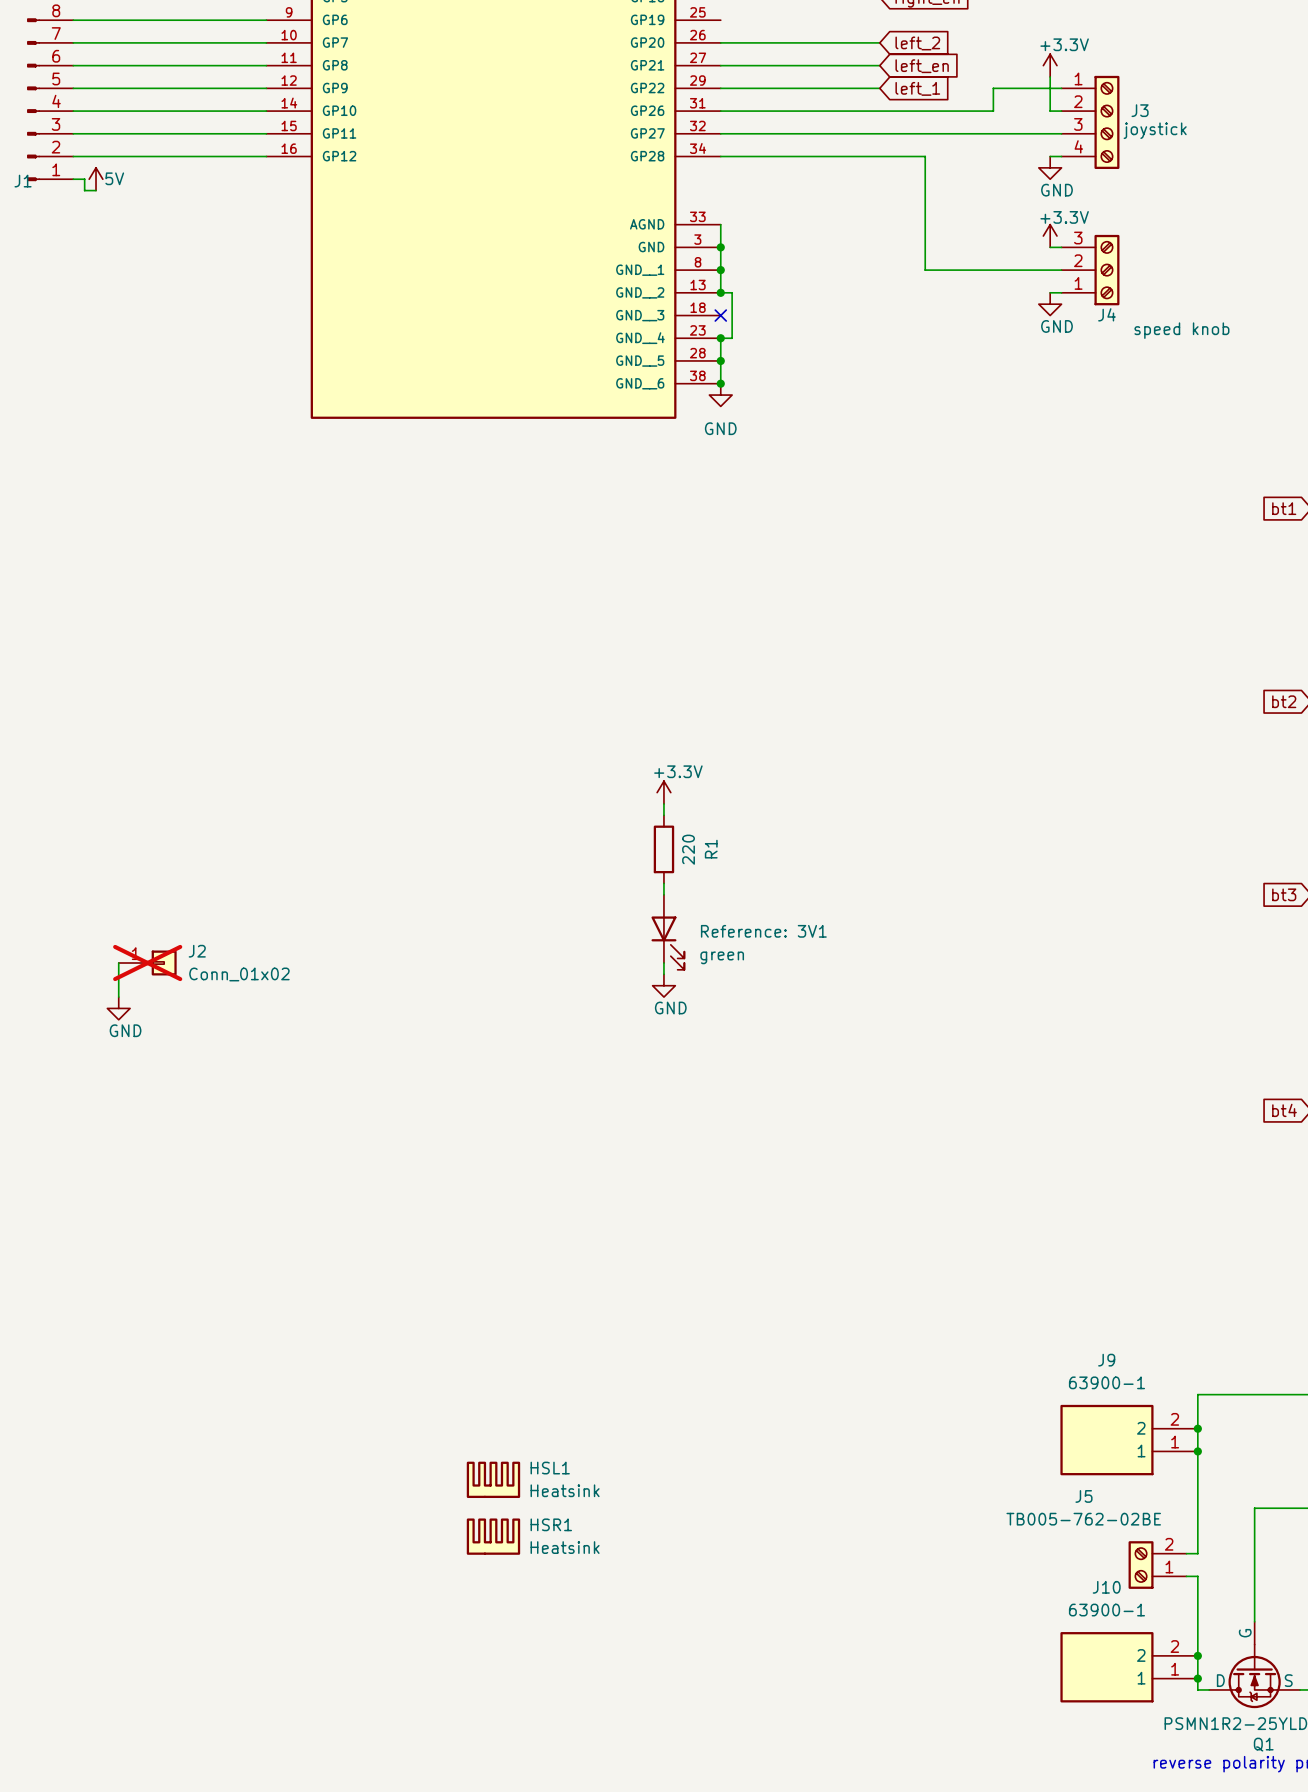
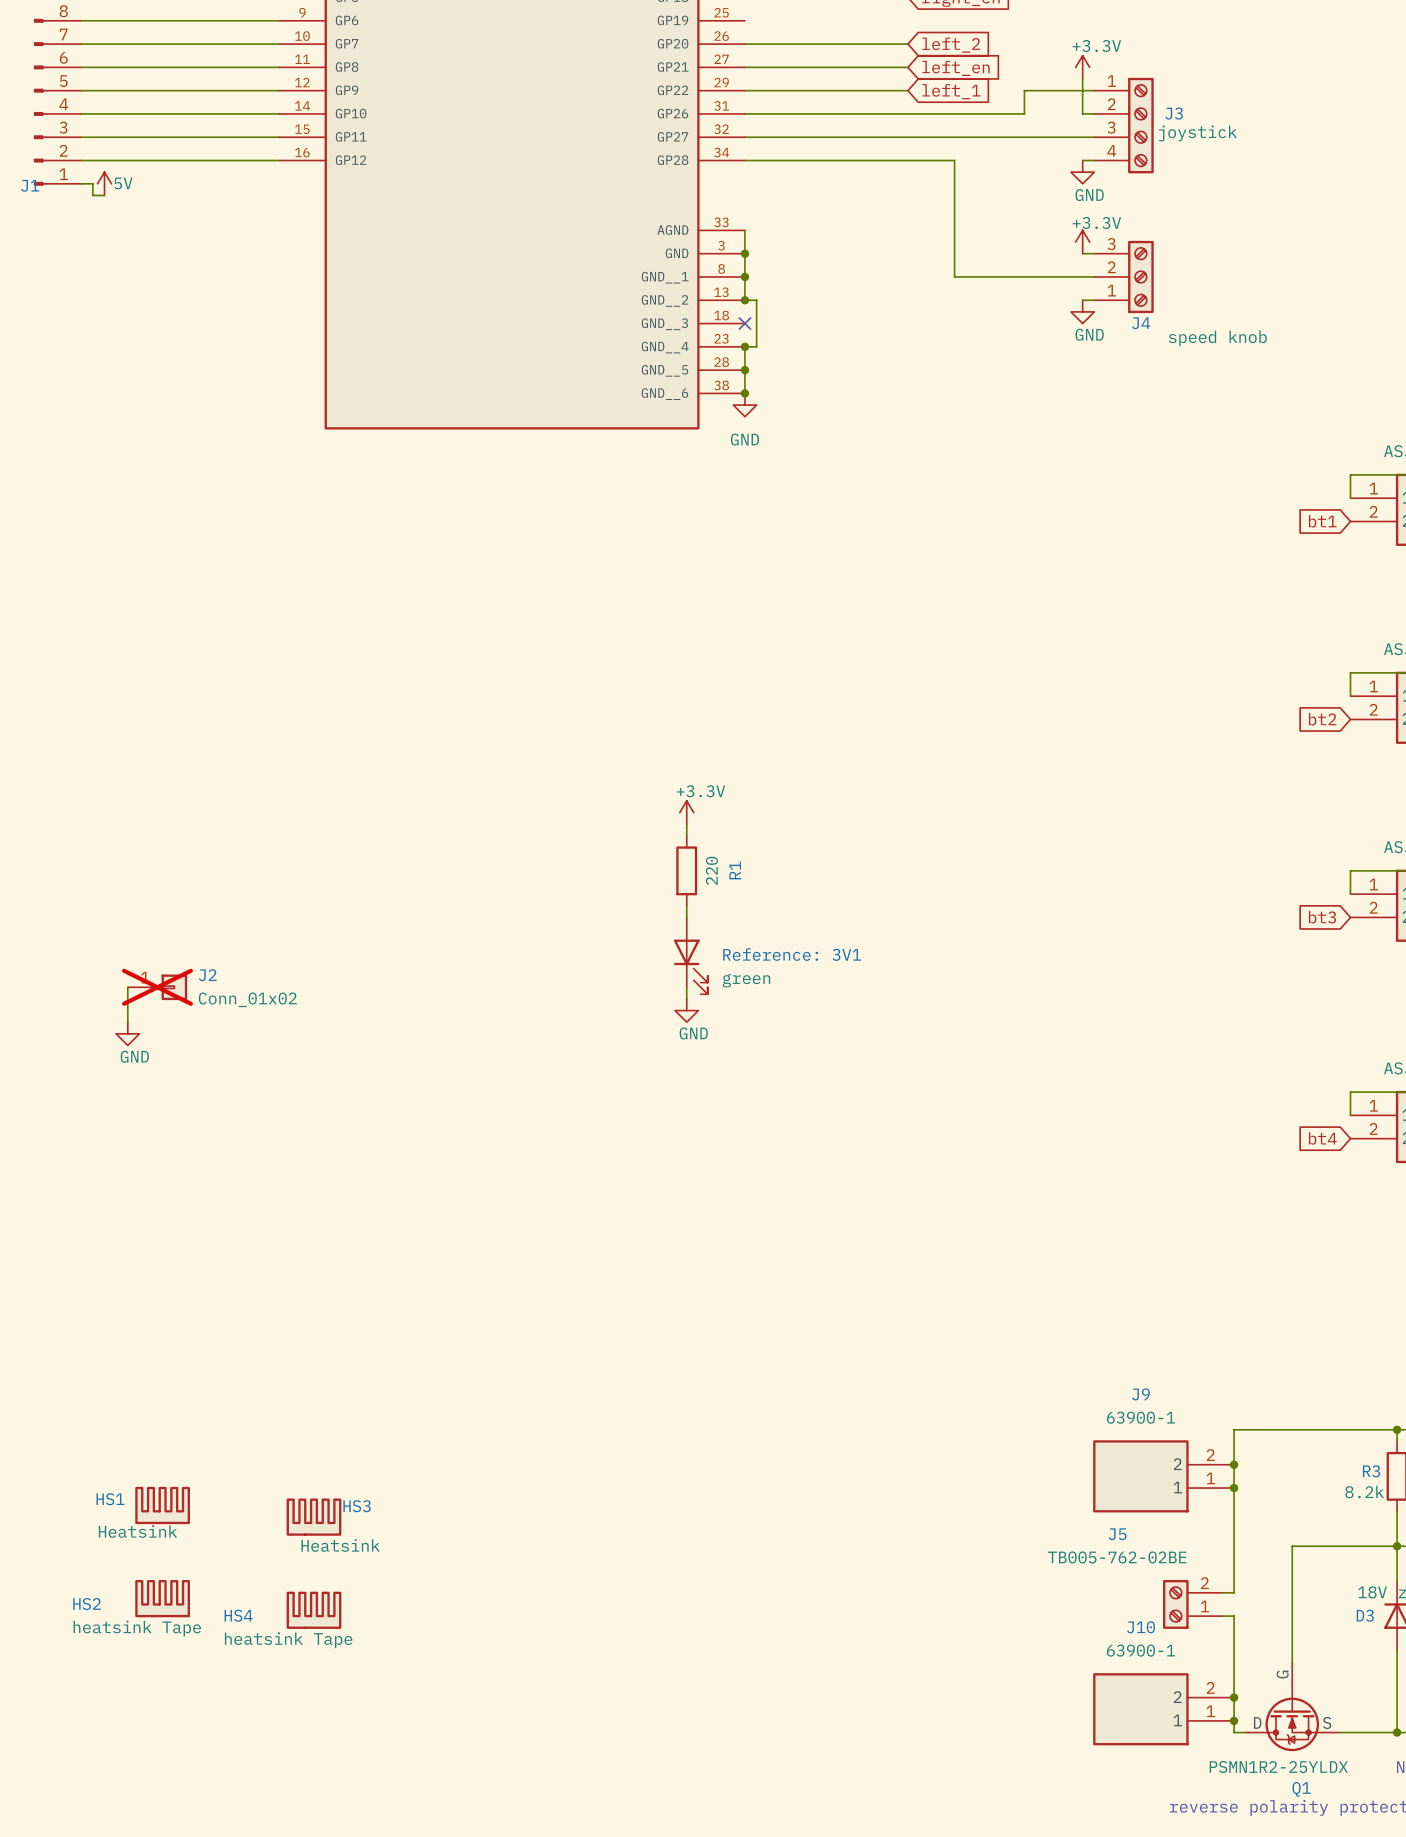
HS1: none -> Heatsink (162, 1505)
HS3: none -> Heatsink (314, 1517)
HSL1: Heatsink (493, 1479) -> none
HSR1: Heatsink (493, 1536) -> none
HS2: none -> heatsink Tape (162, 1598)
HS4: none -> heatsink Tape (314, 1610)

